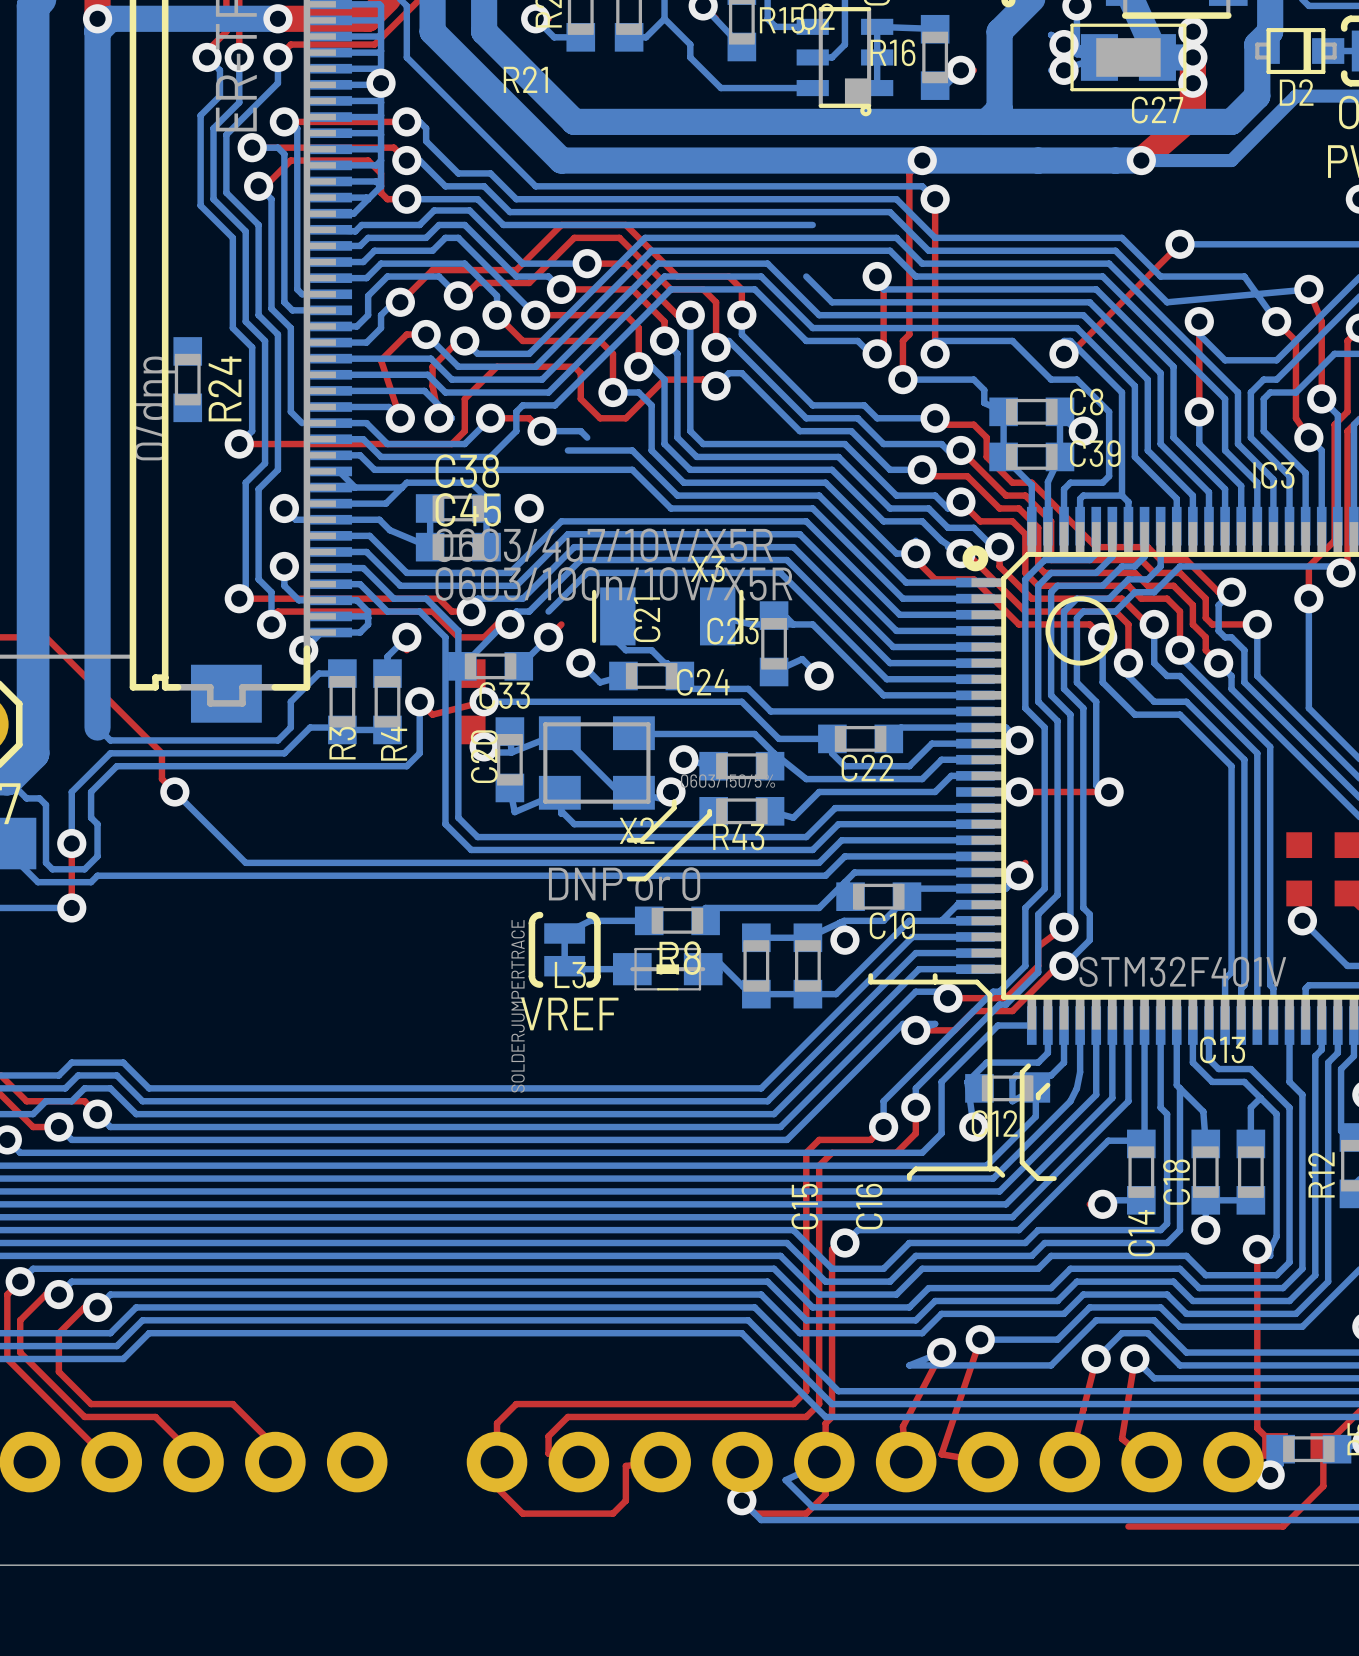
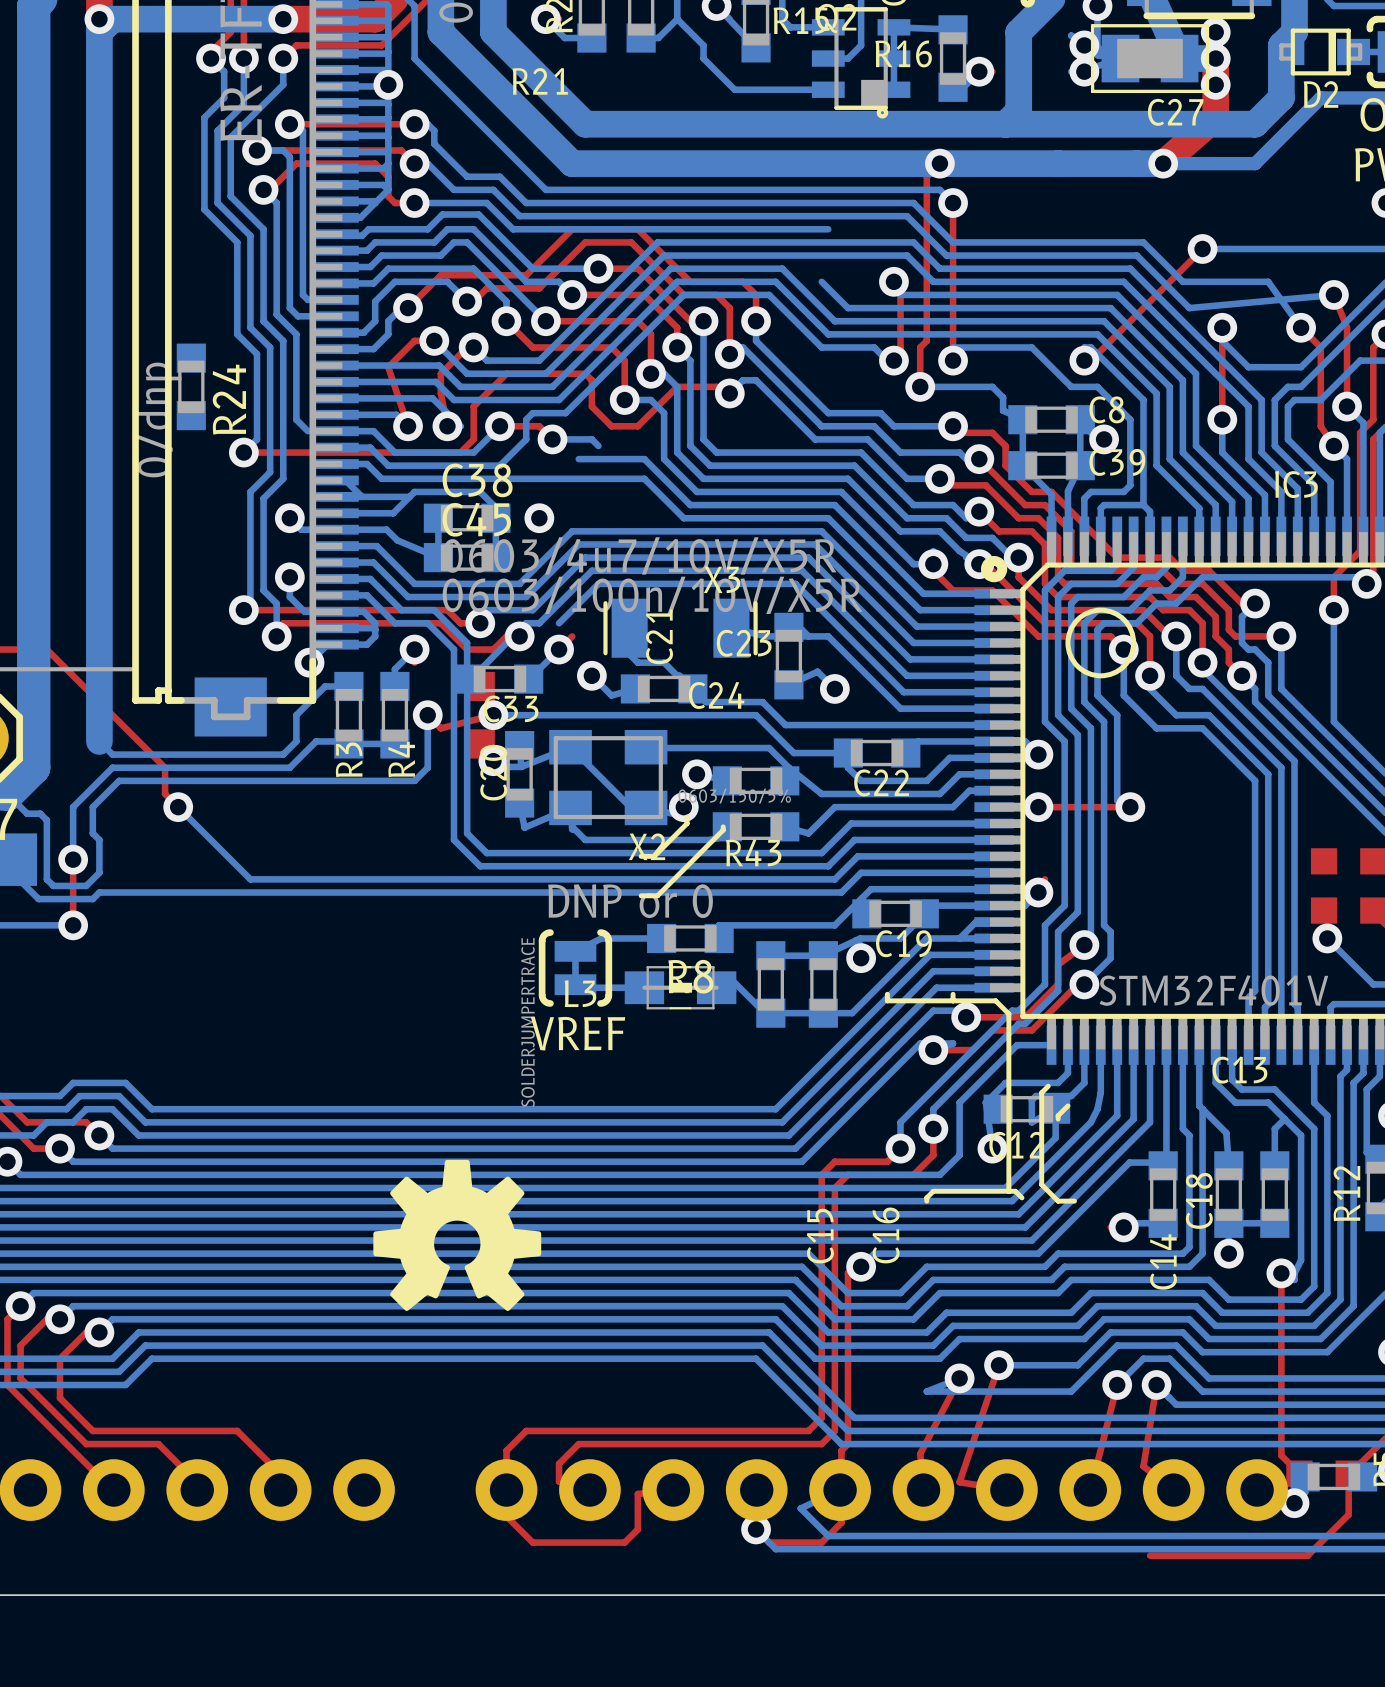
drawing: none -> [373, 1159, 542, 1311]

